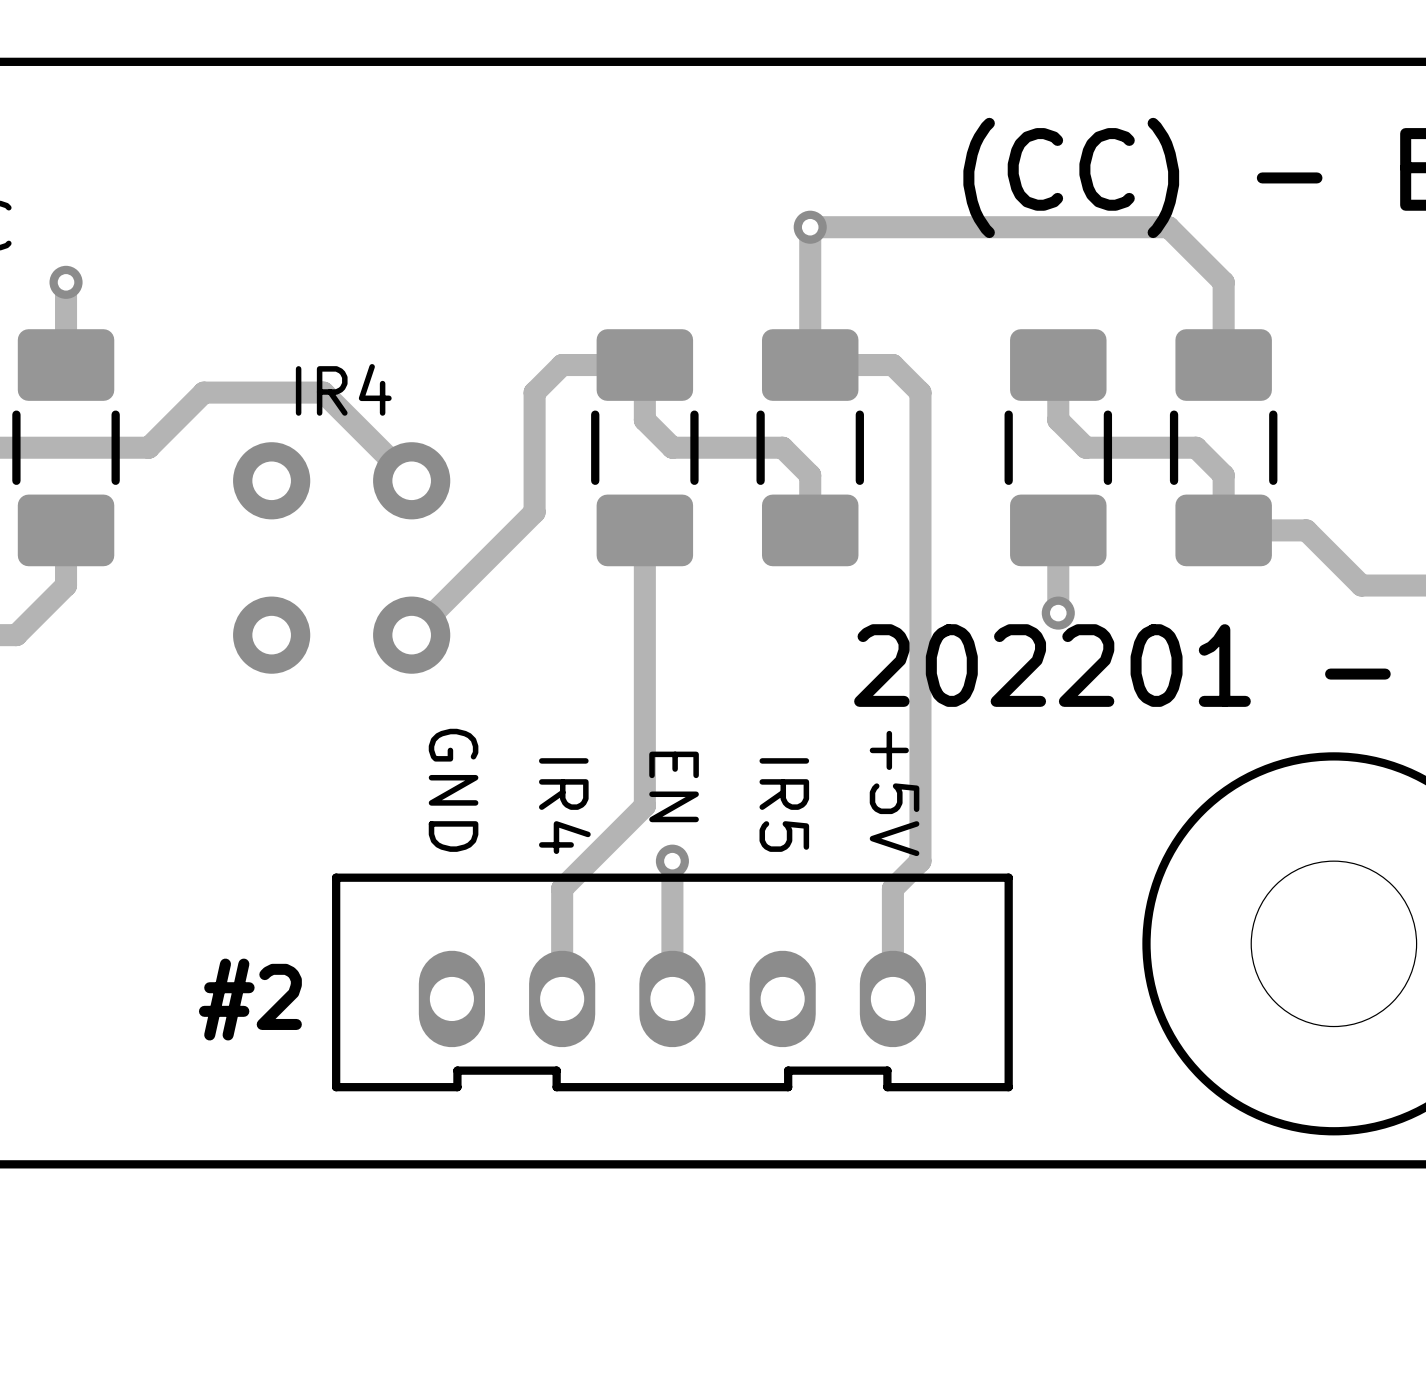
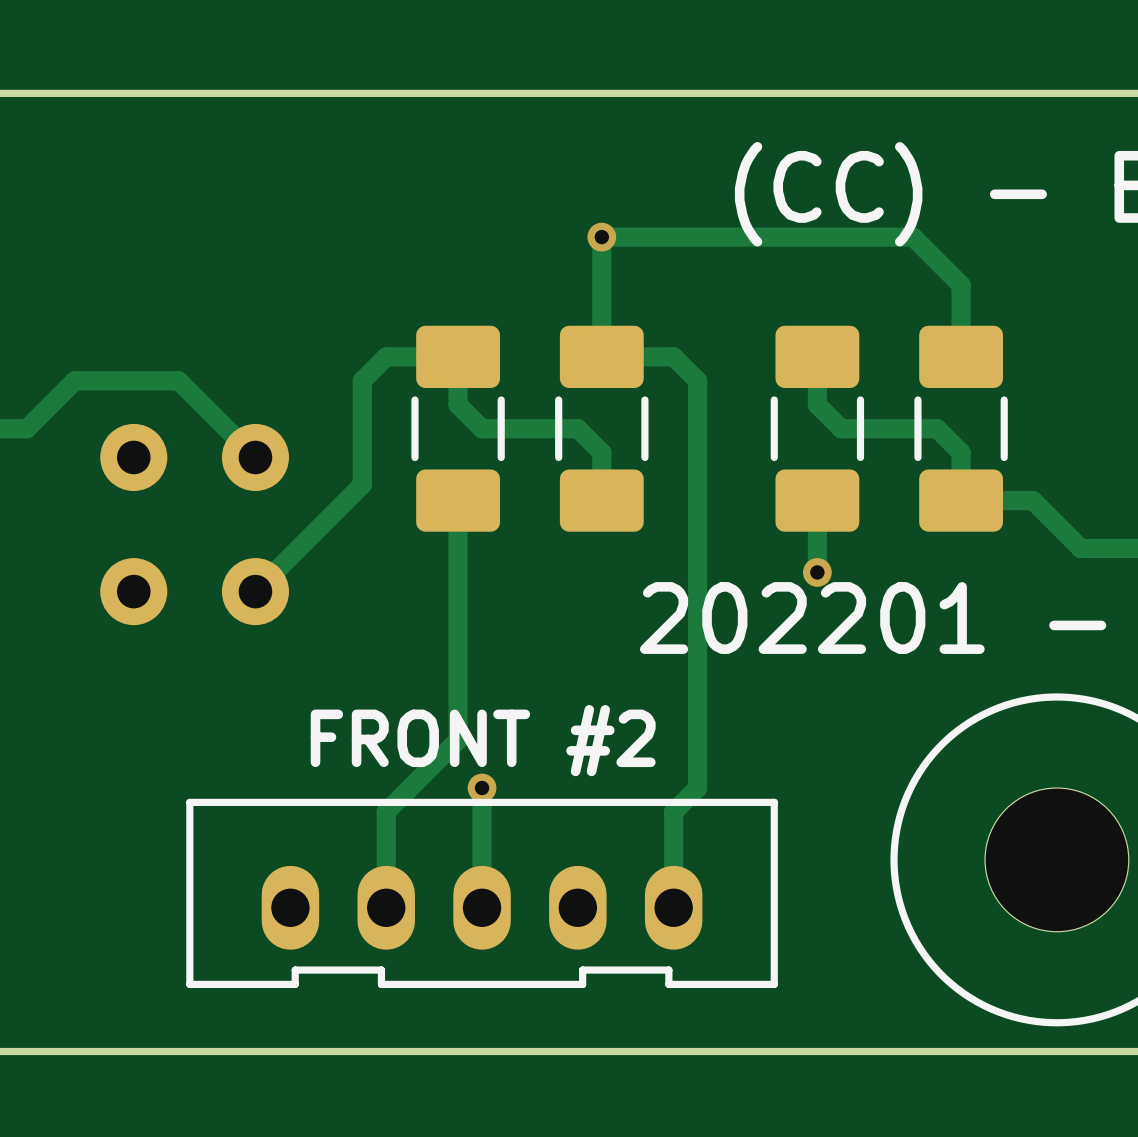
text: IR4 (343, 389) -> none
text: EN (674, 786) -> FRONT #2 (483, 740)
text: GND (453, 790) -> none
text: +5V (894, 793) -> none
text: IR5 (784, 805) -> none
text: IR4 (564, 806) -> none
text: #2 (250, 999) -> none

